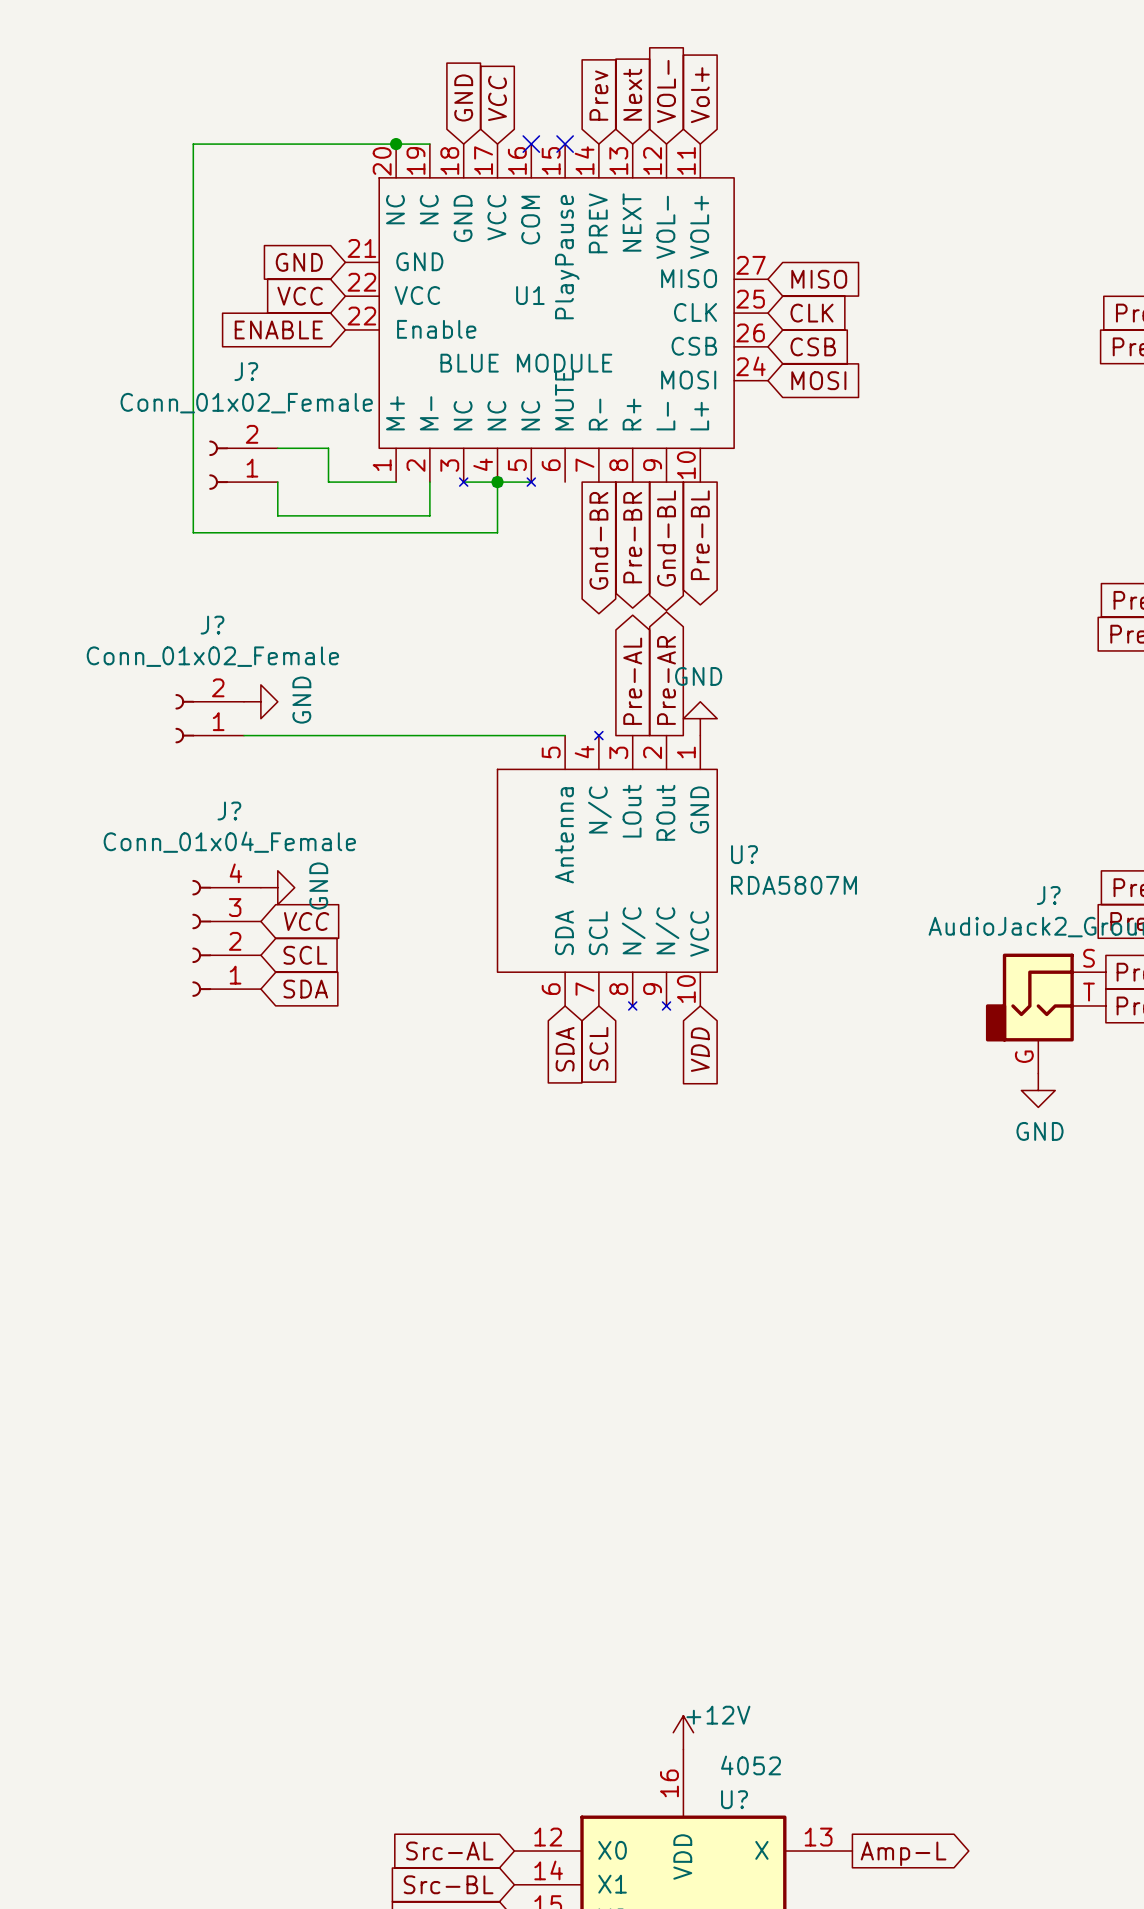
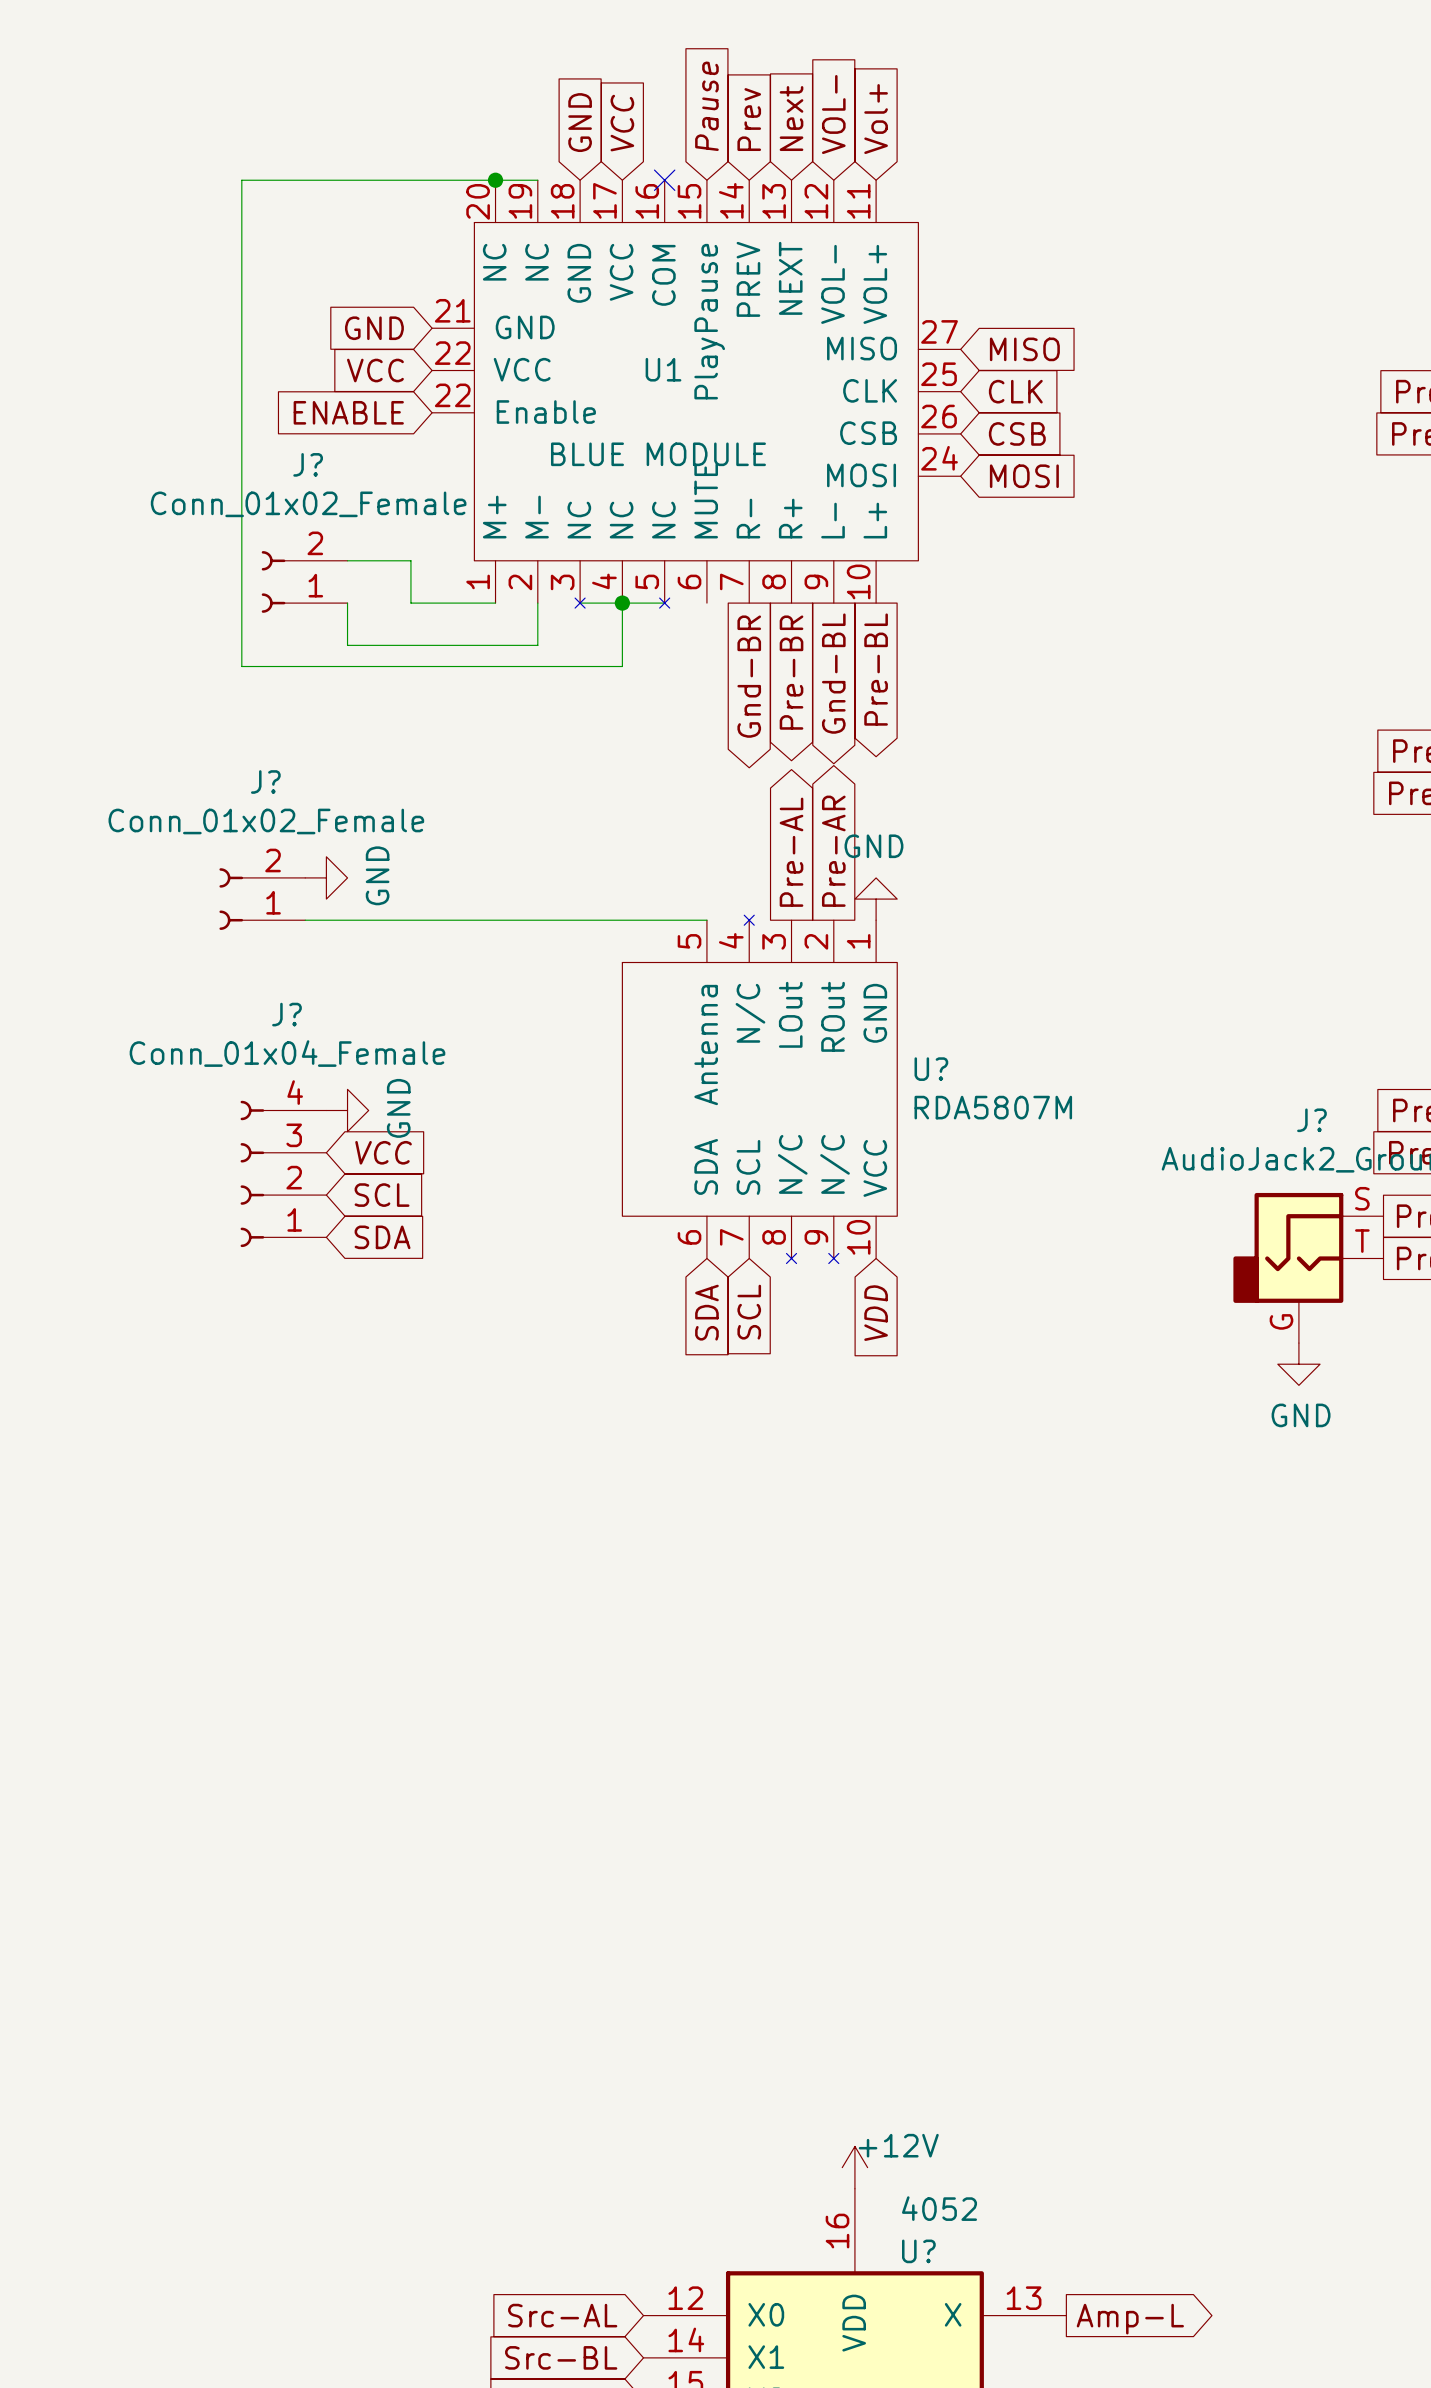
global label: none -> Pause (706, 106)
no-connect mark: (565, 144) -> none

